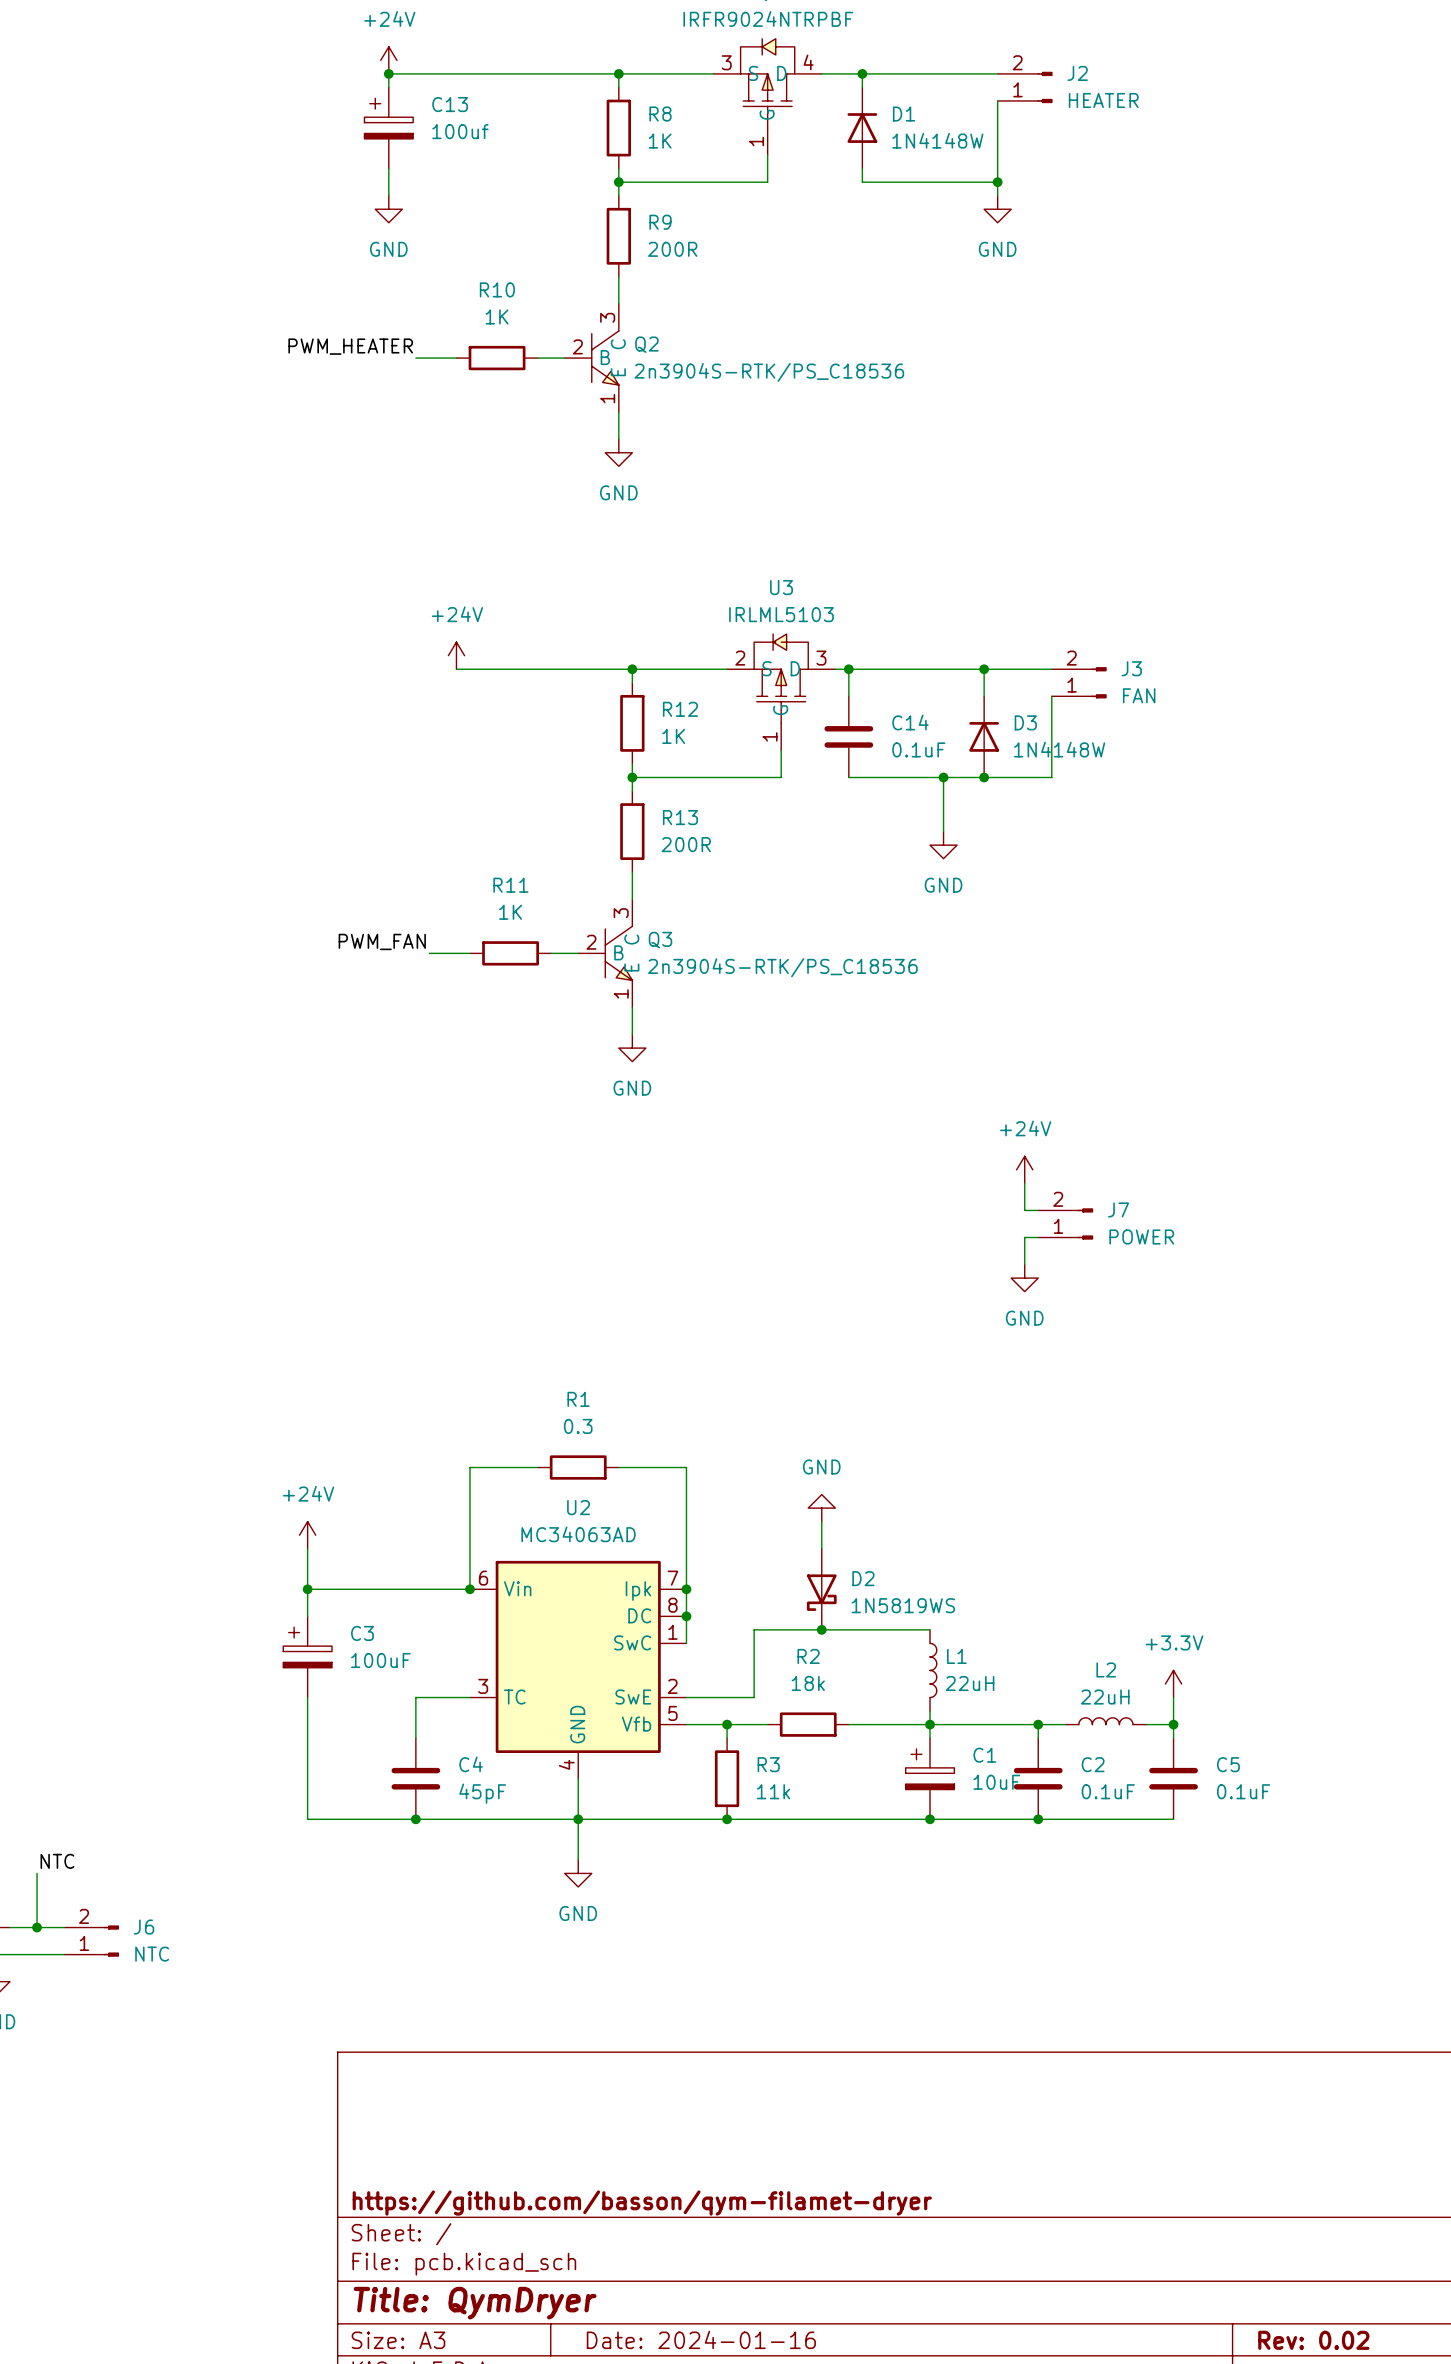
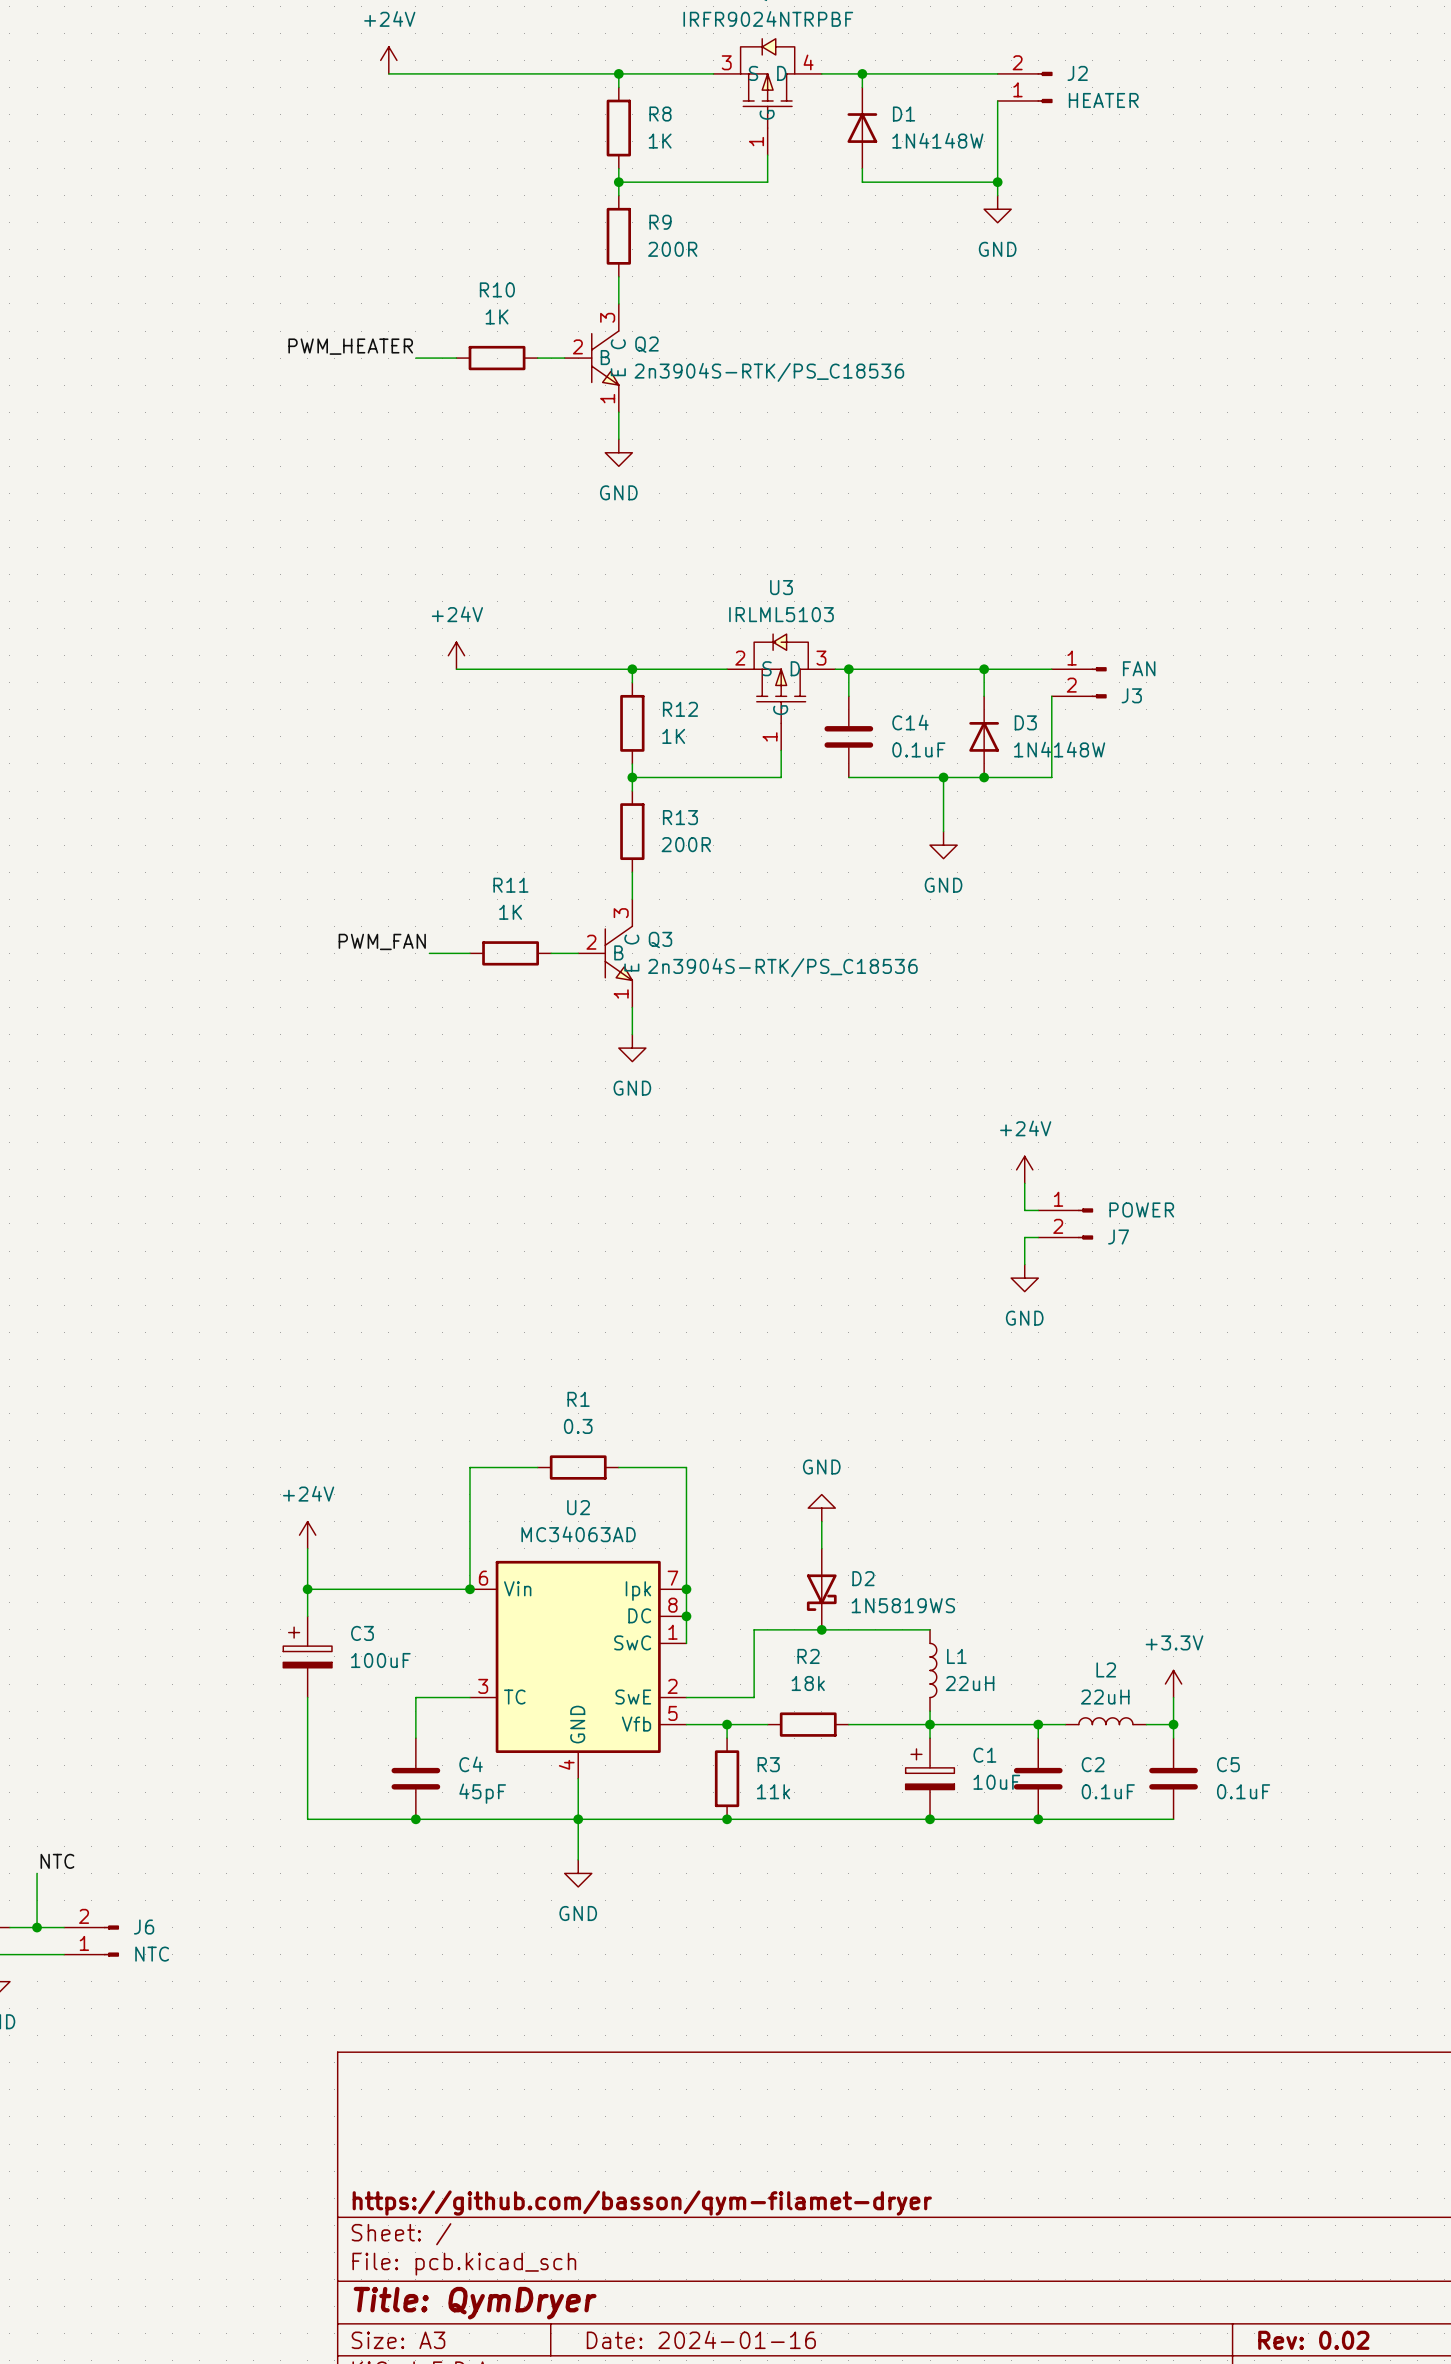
wire: (388, 73) (388, 87) -> none
junction: (388, 73) -> none
C13: 100uf (388, 128) -> none
wire: (388, 168) (388, 195) -> none
power symbol: GND (388, 209) -> none
J3 flip: as is (1099, 682) -> up-down (1099, 682)
J7 flip: as is (1085, 1223) -> up-down (1085, 1223)

